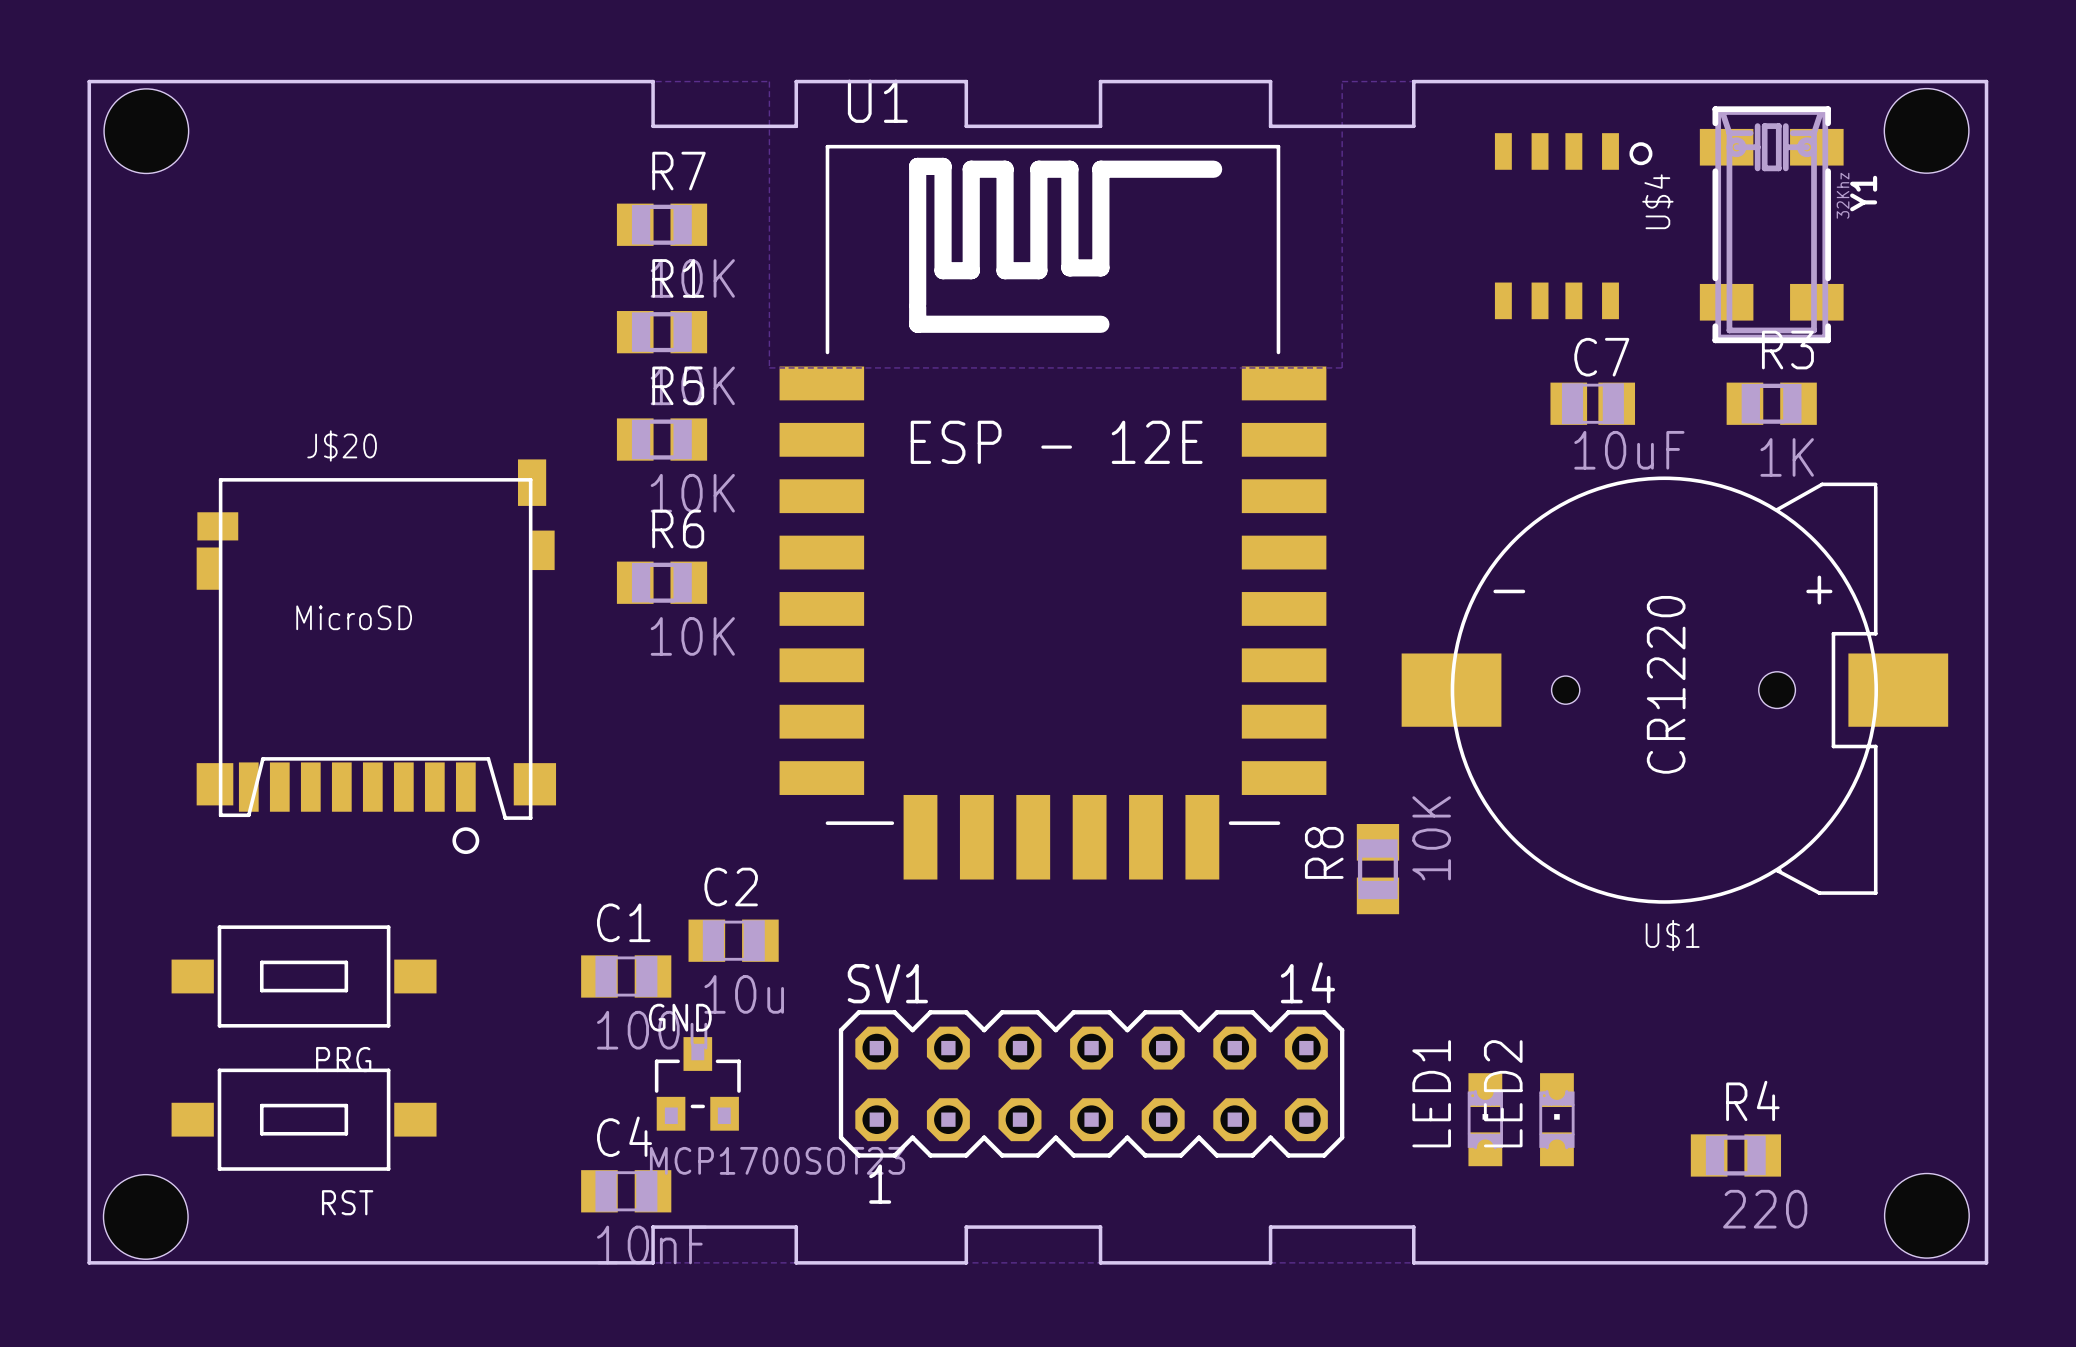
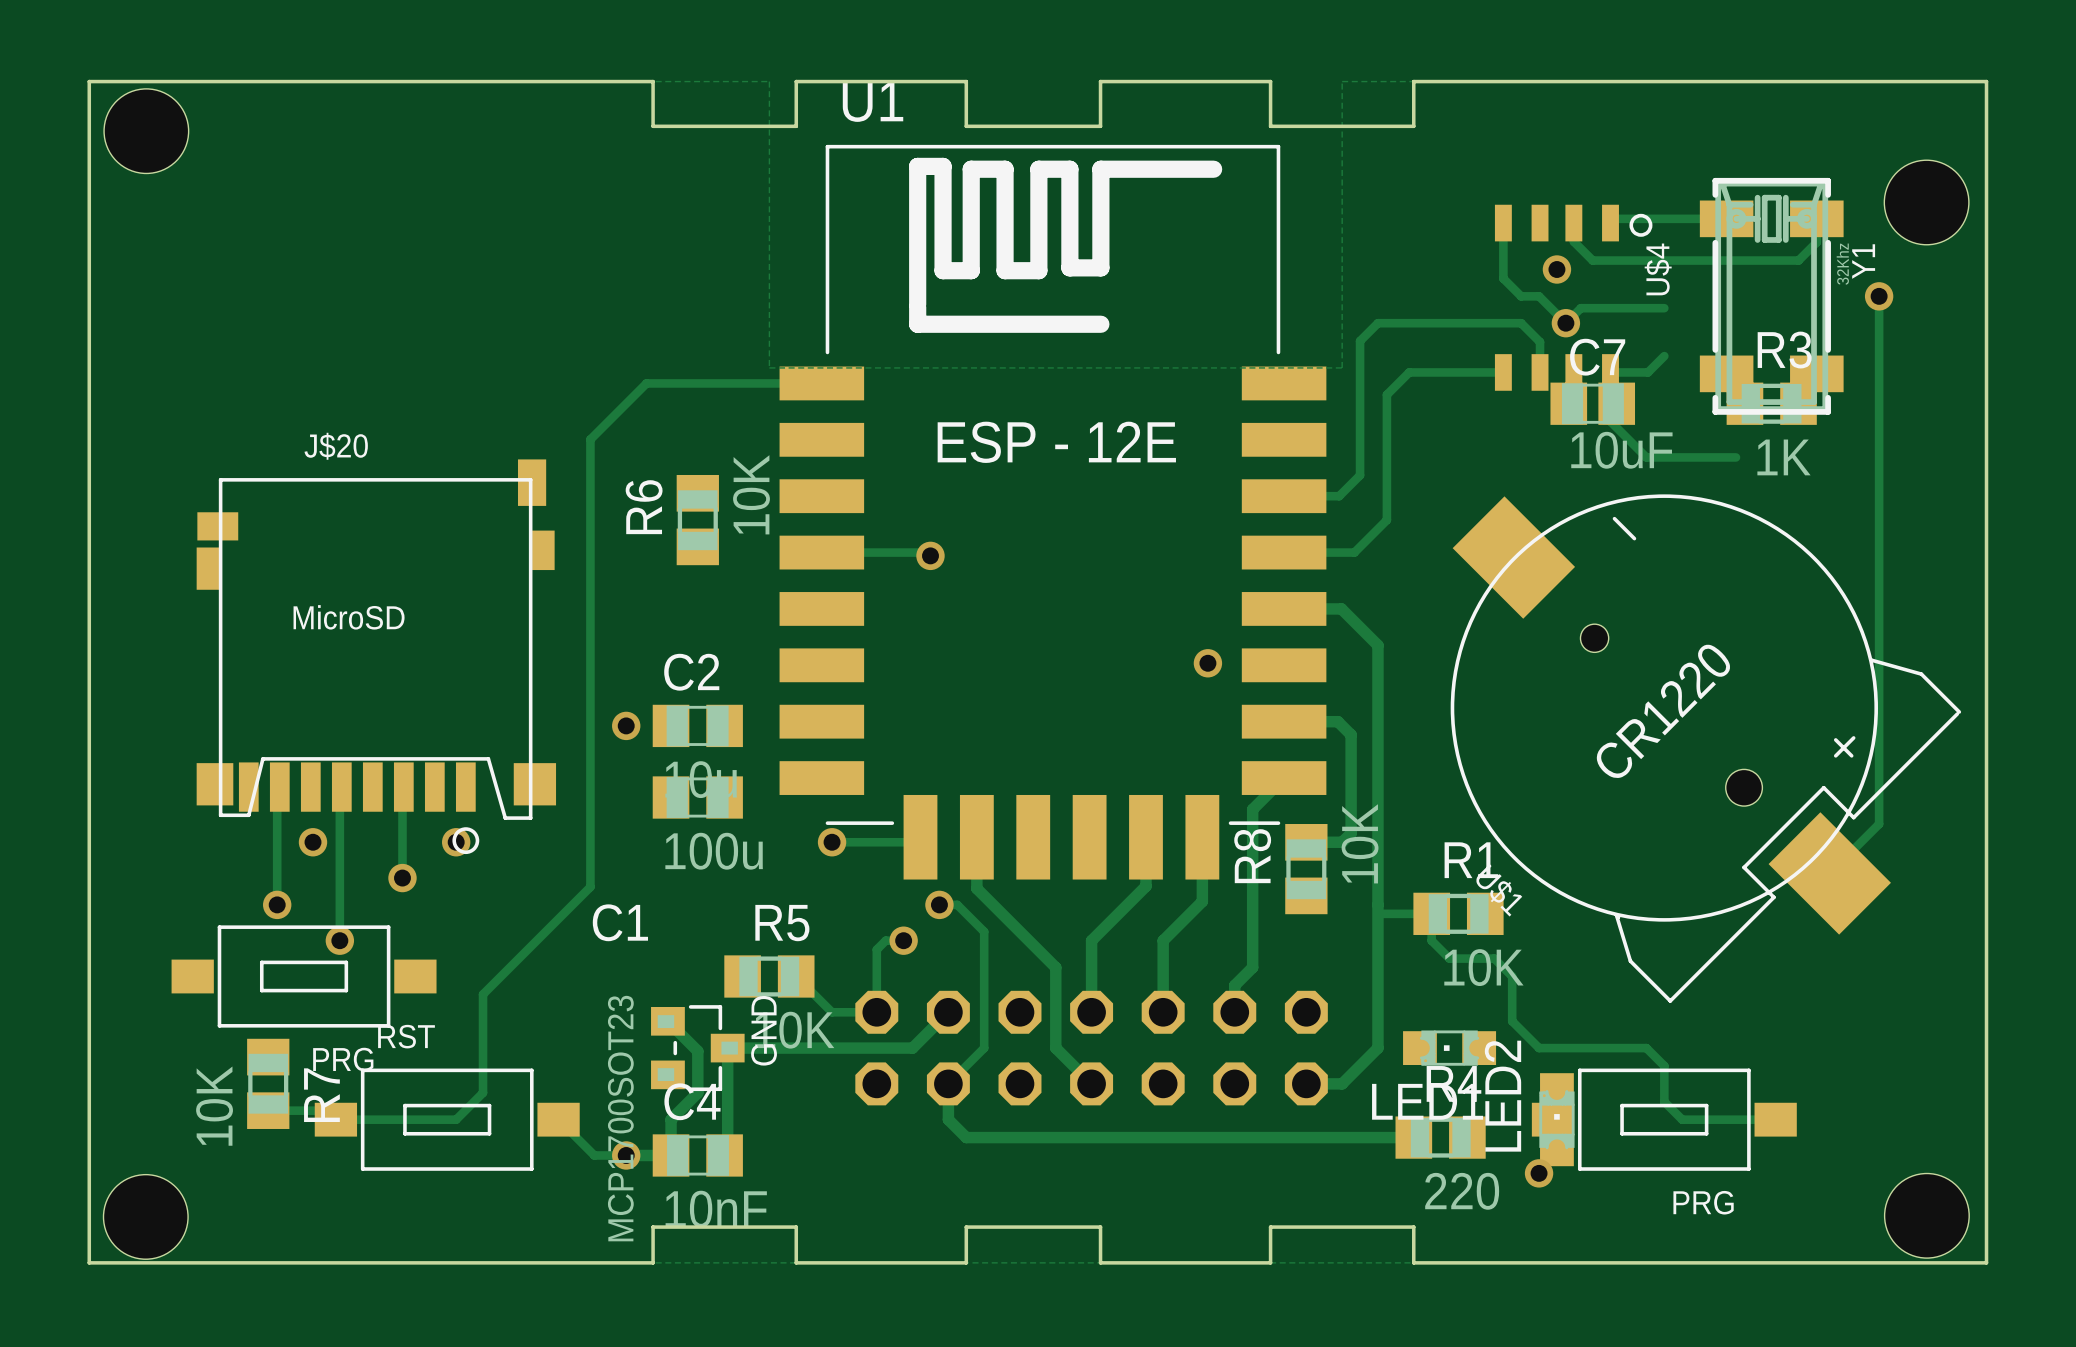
hole position: (1926, 130) -> (1926, 202)
track: none -> (1726, 218) (1614, 218) (1610, 223)
track: none -> (1816, 218) (1816, 242) (1798, 260) (1592, 260) (1573, 241) (1573, 223)
track: none -> (1503, 223) (1503, 278) (1521, 296) (1539, 296) (1565, 323) (1580, 308) (1664, 308)
R7 rotation: 0° (662, 224) -> 90° clockwise (268, 1083)
R7 position: (662, 224) -> (268, 1083)
Y1 position: (1771, 224) -> (1771, 296)
U$4 position: (1573, 226) -> (1573, 297)
via: none -> (1556, 269)
track: none -> (1879, 296) (1879, 824) (1829, 873)
via: none -> (1879, 296)
via: none -> (1565, 323)
R1 position: (662, 332) -> (1458, 913)
track: none -> (1664, 356) (1647, 372) (1610, 372) (1610, 421) (1646, 457) (1736, 457)
track: none -> (1503, 372) (1409, 372) (1386, 394) (1386, 520) (1354, 552) (1284, 552)
track: none -> (1540, 372) (1540, 342) (1521, 323) (1377, 323) (1360, 341) (1360, 475) (1339, 496) (1284, 496)
track: none -> (821, 383) (646, 383) (590, 439) (590, 887) (483, 994) (483, 1092) (456, 1119) (335, 1119) (326, 1110) (268, 1110)
R5 position: (662, 439) -> (769, 976)
R6 name position: R6 (678, 529) -> R6 (644, 507)
track: none -> (821, 552) (927, 552) (930, 555)
via: none -> (930, 555)
R6 rotation: 0° (662, 582) -> 90° clockwise (697, 520)
R6 position: (662, 582) -> (697, 520)
track: none -> (1284, 608) (1341, 608) (1377, 645) (1377, 1048) (1342, 1083) (1306, 1083)
R6 value position: 10K (692, 636) -> 10K (751, 494)
via: none -> (1207, 663)
U$1 rotation: 0° (1674, 690) -> 45° clockwise (1705, 748)
track: none -> (1284, 721) (1337, 721) (1351, 734) (1351, 833) (1342, 842) (1306, 842)
via: none -> (626, 725)
track: none -> (1284, 778) (1252, 809) (1252, 967) (1234, 985) (1234, 1012)
track: none -> (279, 787) (277, 789) (277, 904)
track: none -> (341, 787) (339, 789) (339, 940)
track: none -> (403, 787) (402, 878)
track: none -> (920, 837) (915, 842) (832, 842)
track: none -> (976, 837) (976, 888) (1055, 967) (1055, 1048) (1091, 1083)
track: none -> (1145, 837) (1145, 886) (1091, 940) (1091, 1012)
track: none -> (1202, 837) (1202, 901) (1163, 940) (1163, 1012)
via: none -> (313, 842)
via: none -> (456, 842)
via: none -> (832, 842)
R8 position: (1377, 869) -> (1306, 869)
via: none -> (402, 878)
via: none -> (277, 904)
track: none -> (939, 904) (957, 904) (984, 931) (984, 1048) (948, 1083) (948, 1119) (966, 1137) (1413, 1137)
via: none -> (939, 904)
track: none -> (1377, 904) (1377, 913) (1431, 913)
track: none -> (1431, 913) (1431, 940) (1449, 958) (1494, 958) (1512, 976) (1512, 1021) (1539, 1048) (1646, 1048) (1664, 1065) (1664, 1101) (1682, 1119) (1775, 1119)
via: none -> (339, 940)
C2 position: (733, 940) -> (697, 725)
track: none -> (903, 940) (885, 940) (876, 949) (876, 1012) (831, 1012) (796, 976)
via: none -> (903, 940)
C1 position: (626, 976) -> (697, 797)
track: none -> (948, 1012) (912, 1048) (727, 1048) (727, 1152) (724, 1155)
track: none -> (667, 1021) (697, 1051) (697, 1092) (671, 1119) (671, 1155) (594, 1155) (558, 1119)
GND rotation: 0° (697, 1083) -> 90° clockwise (697, 1048)
SV1 side: top (1091, 1083) -> bottom (1091, 1048)
RST position: (304, 1119) -> (447, 1119)
LED1 rotation: 0° (1485, 1119) -> 90° counterclockwise (1449, 1048)
LED1 position: (1485, 1119) -> (1449, 1048)
PRG: none -> (1664, 1119)
via: none -> (626, 1155)
R4 position: (1735, 1155) -> (1440, 1137)
via: none -> (1539, 1173)
C4 position: (626, 1191) -> (697, 1155)
RST name position: RST (347, 1202) -> RST (406, 1036)

